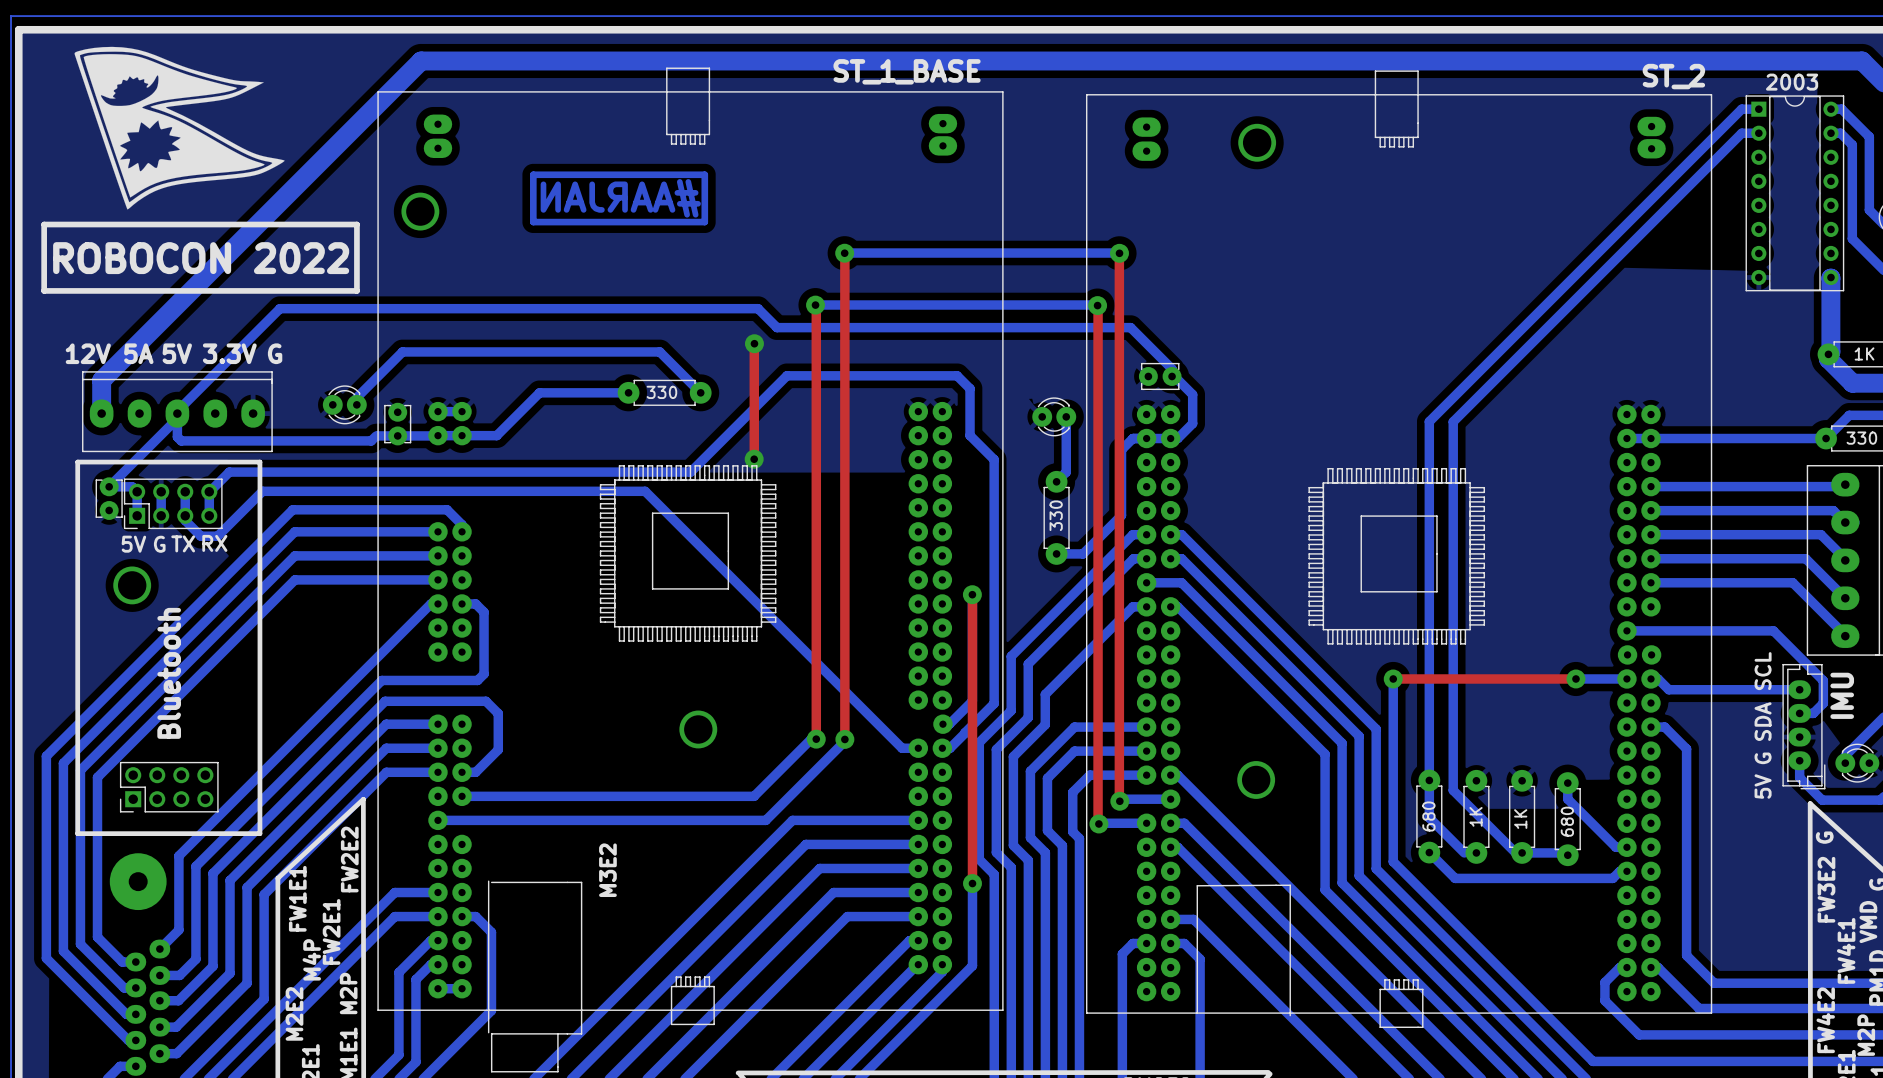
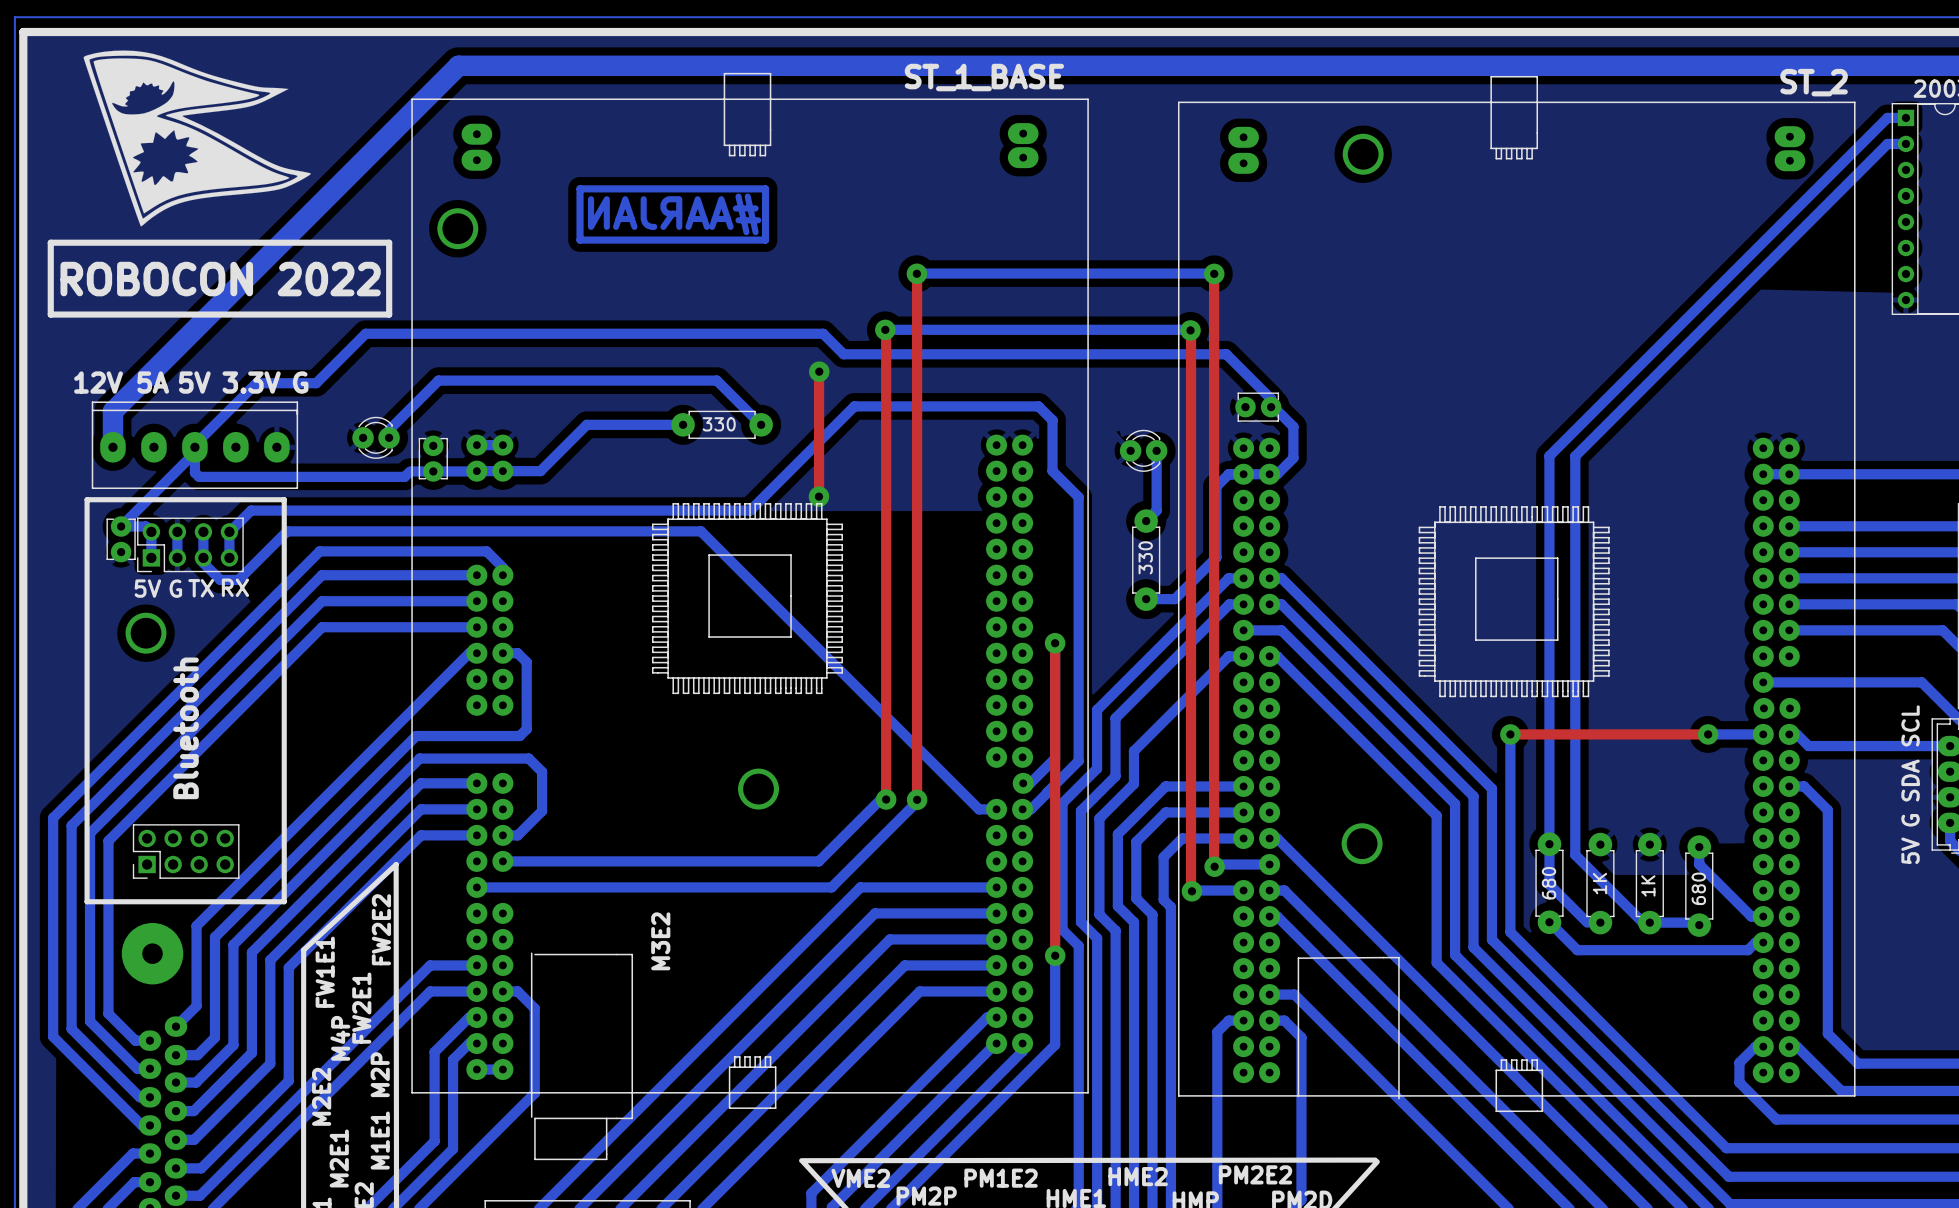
bottom track: (335, 308) (279, 308) (234, 354) -> (365, 333) (316, 383) (256, 383)

